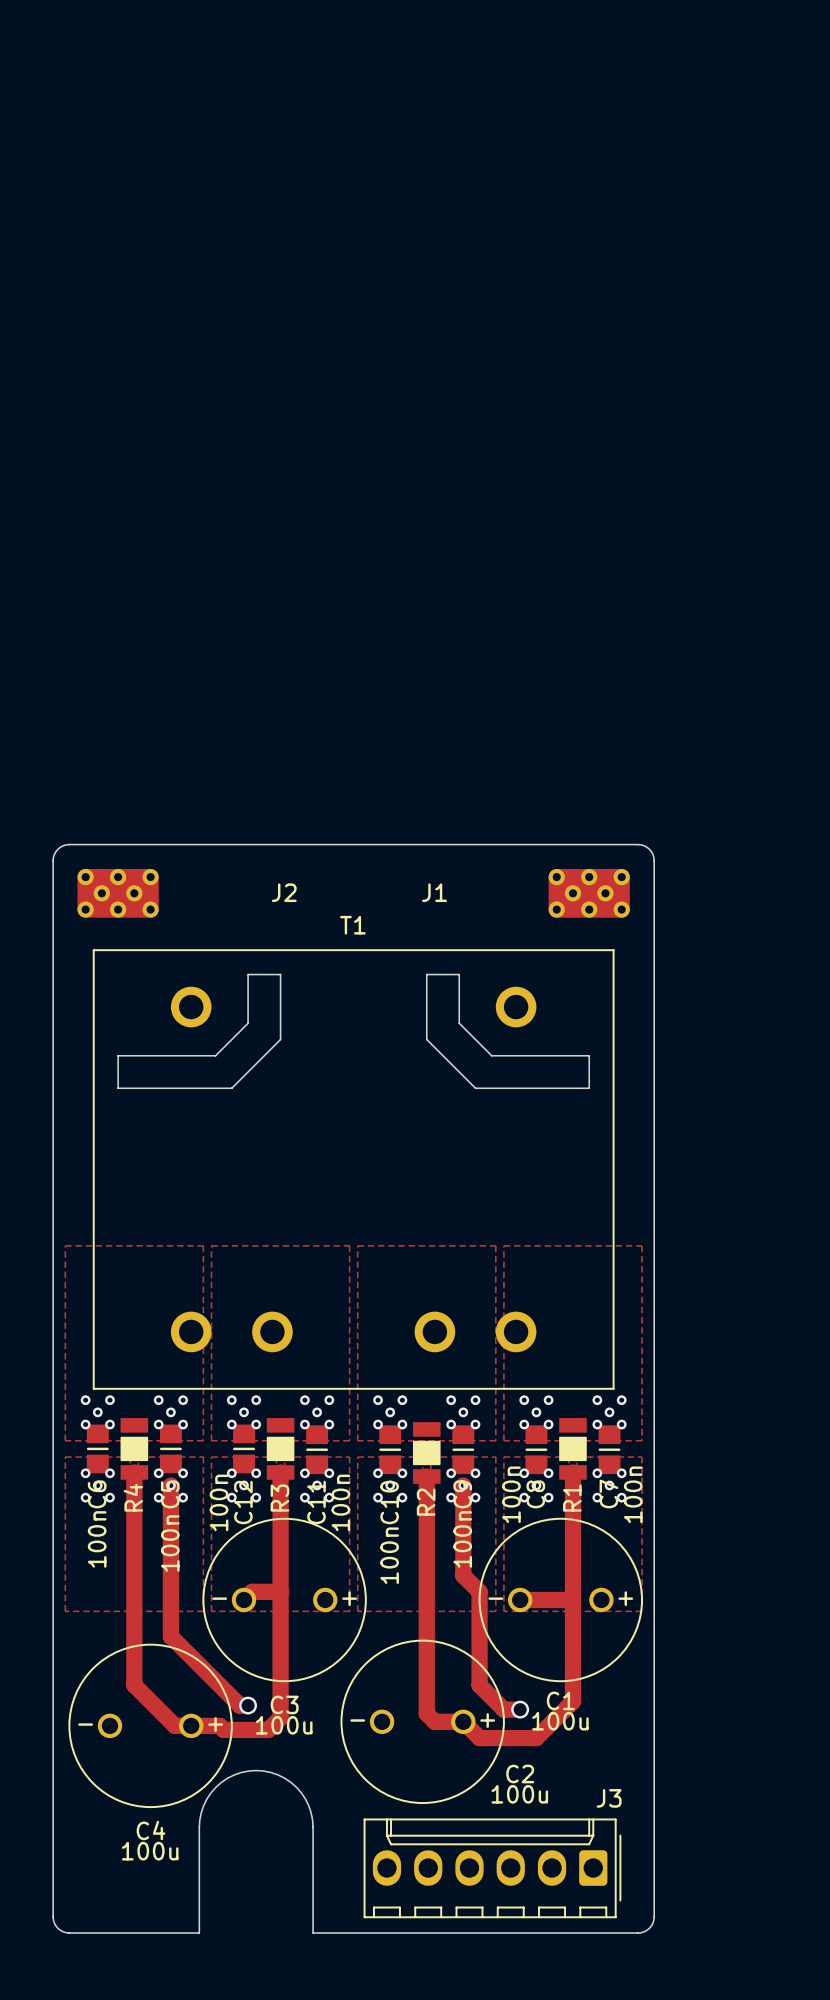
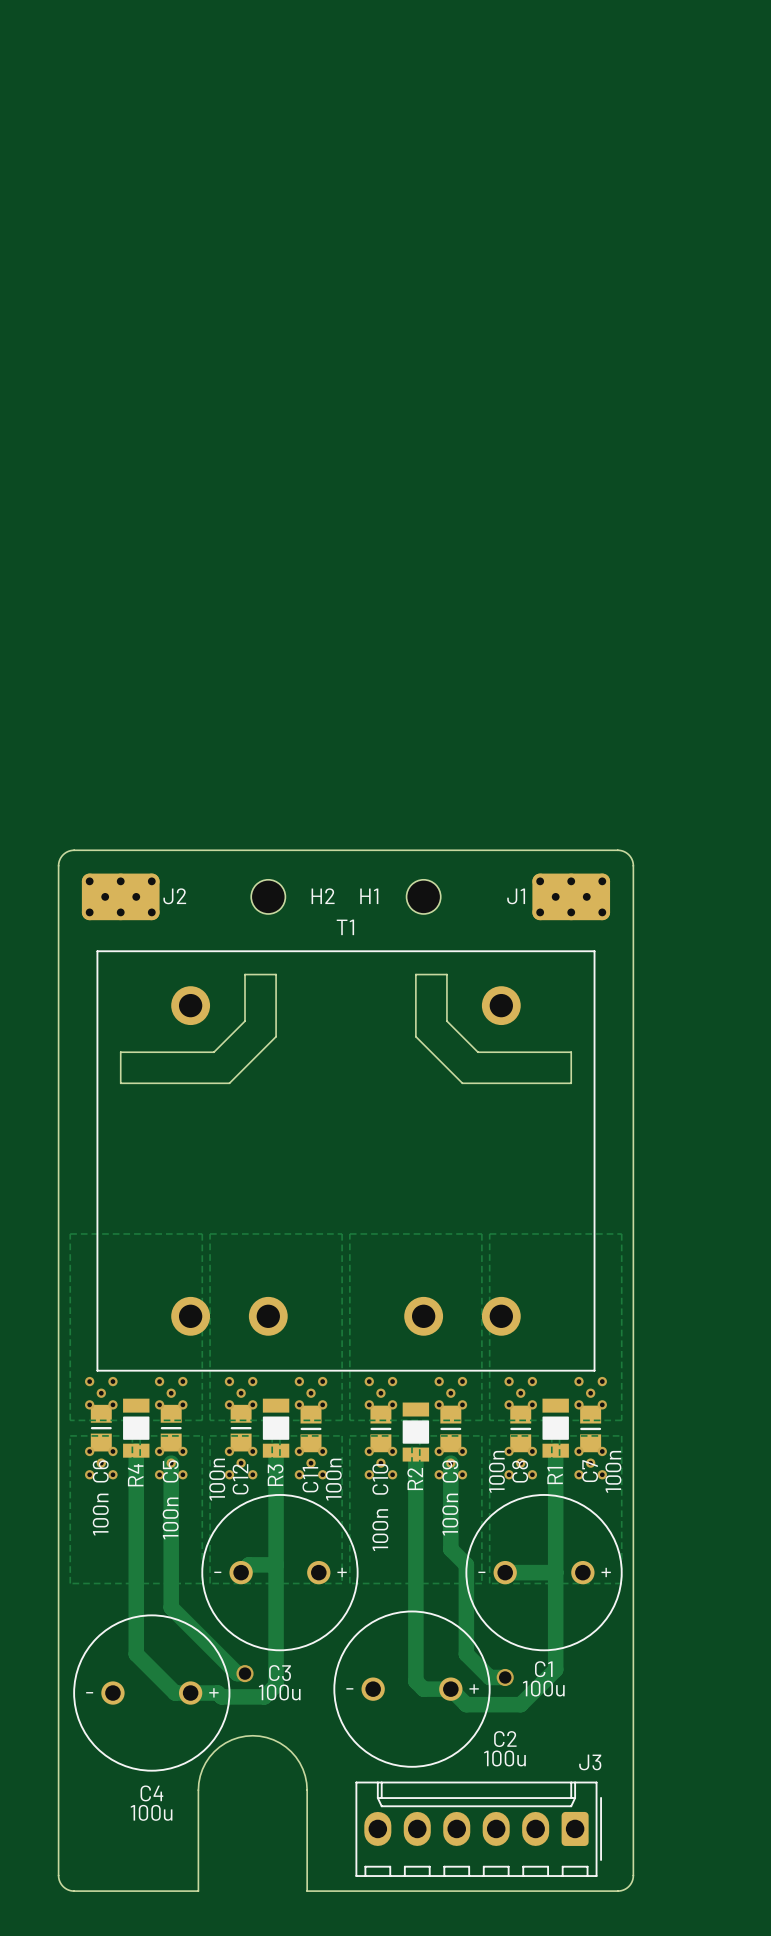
J2 name position: J2 (284, 892) -> J2 (174, 896)
J1 name position: J1 (434, 892) -> J1 (516, 896)
H2: none -> (268, 896)
H1: none -> (423, 896)

